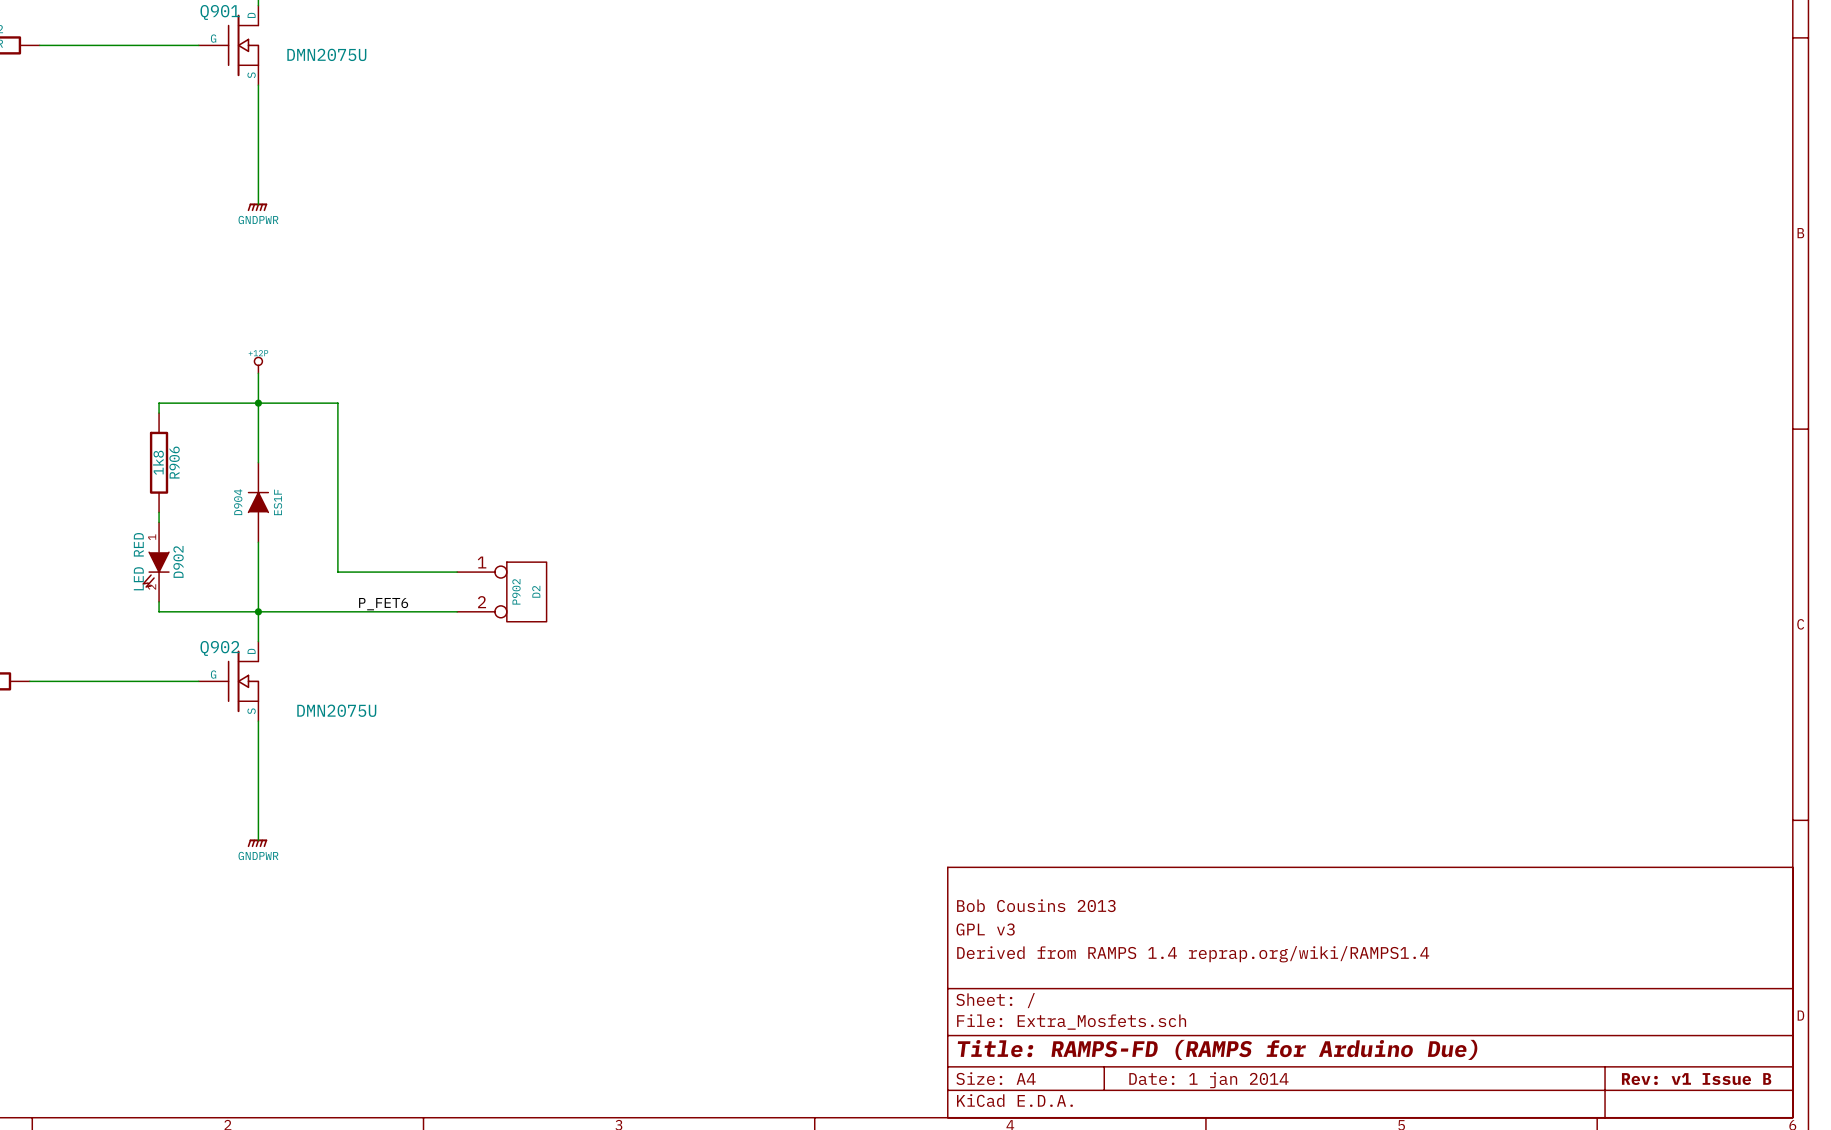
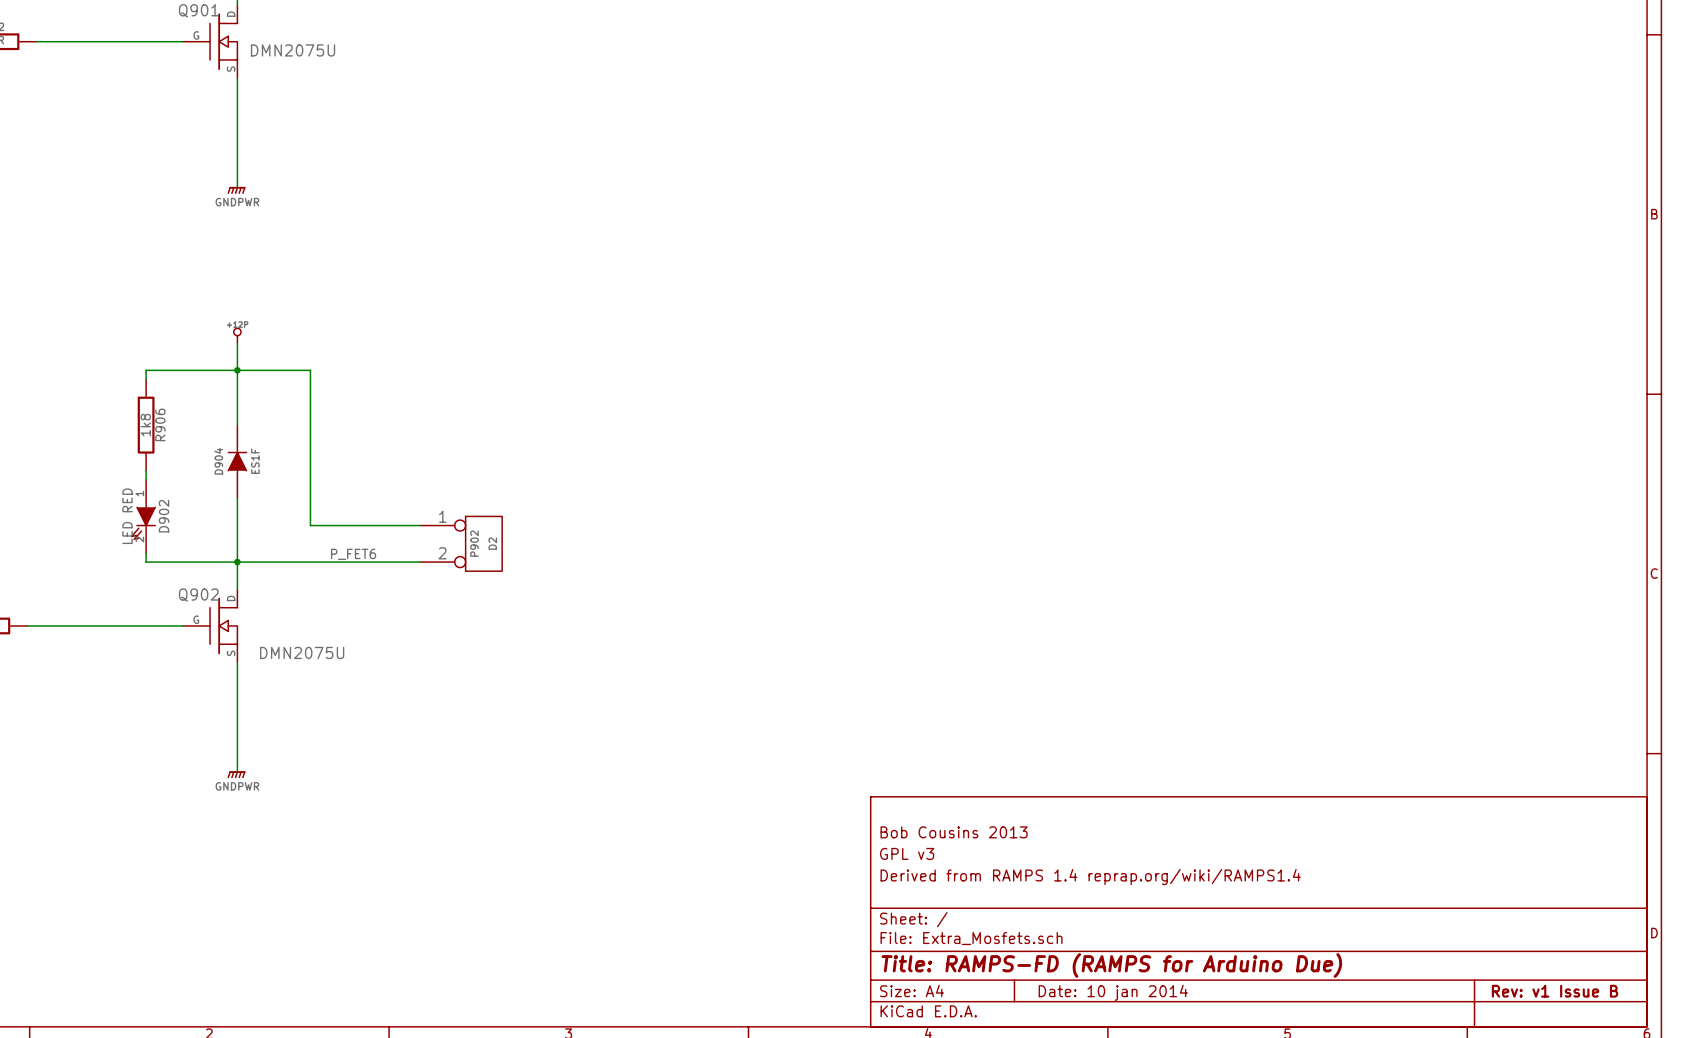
title block: Date: 1 jan 2014 (1208, 1080) -> Date: 10 jan 2014 (1113, 992)

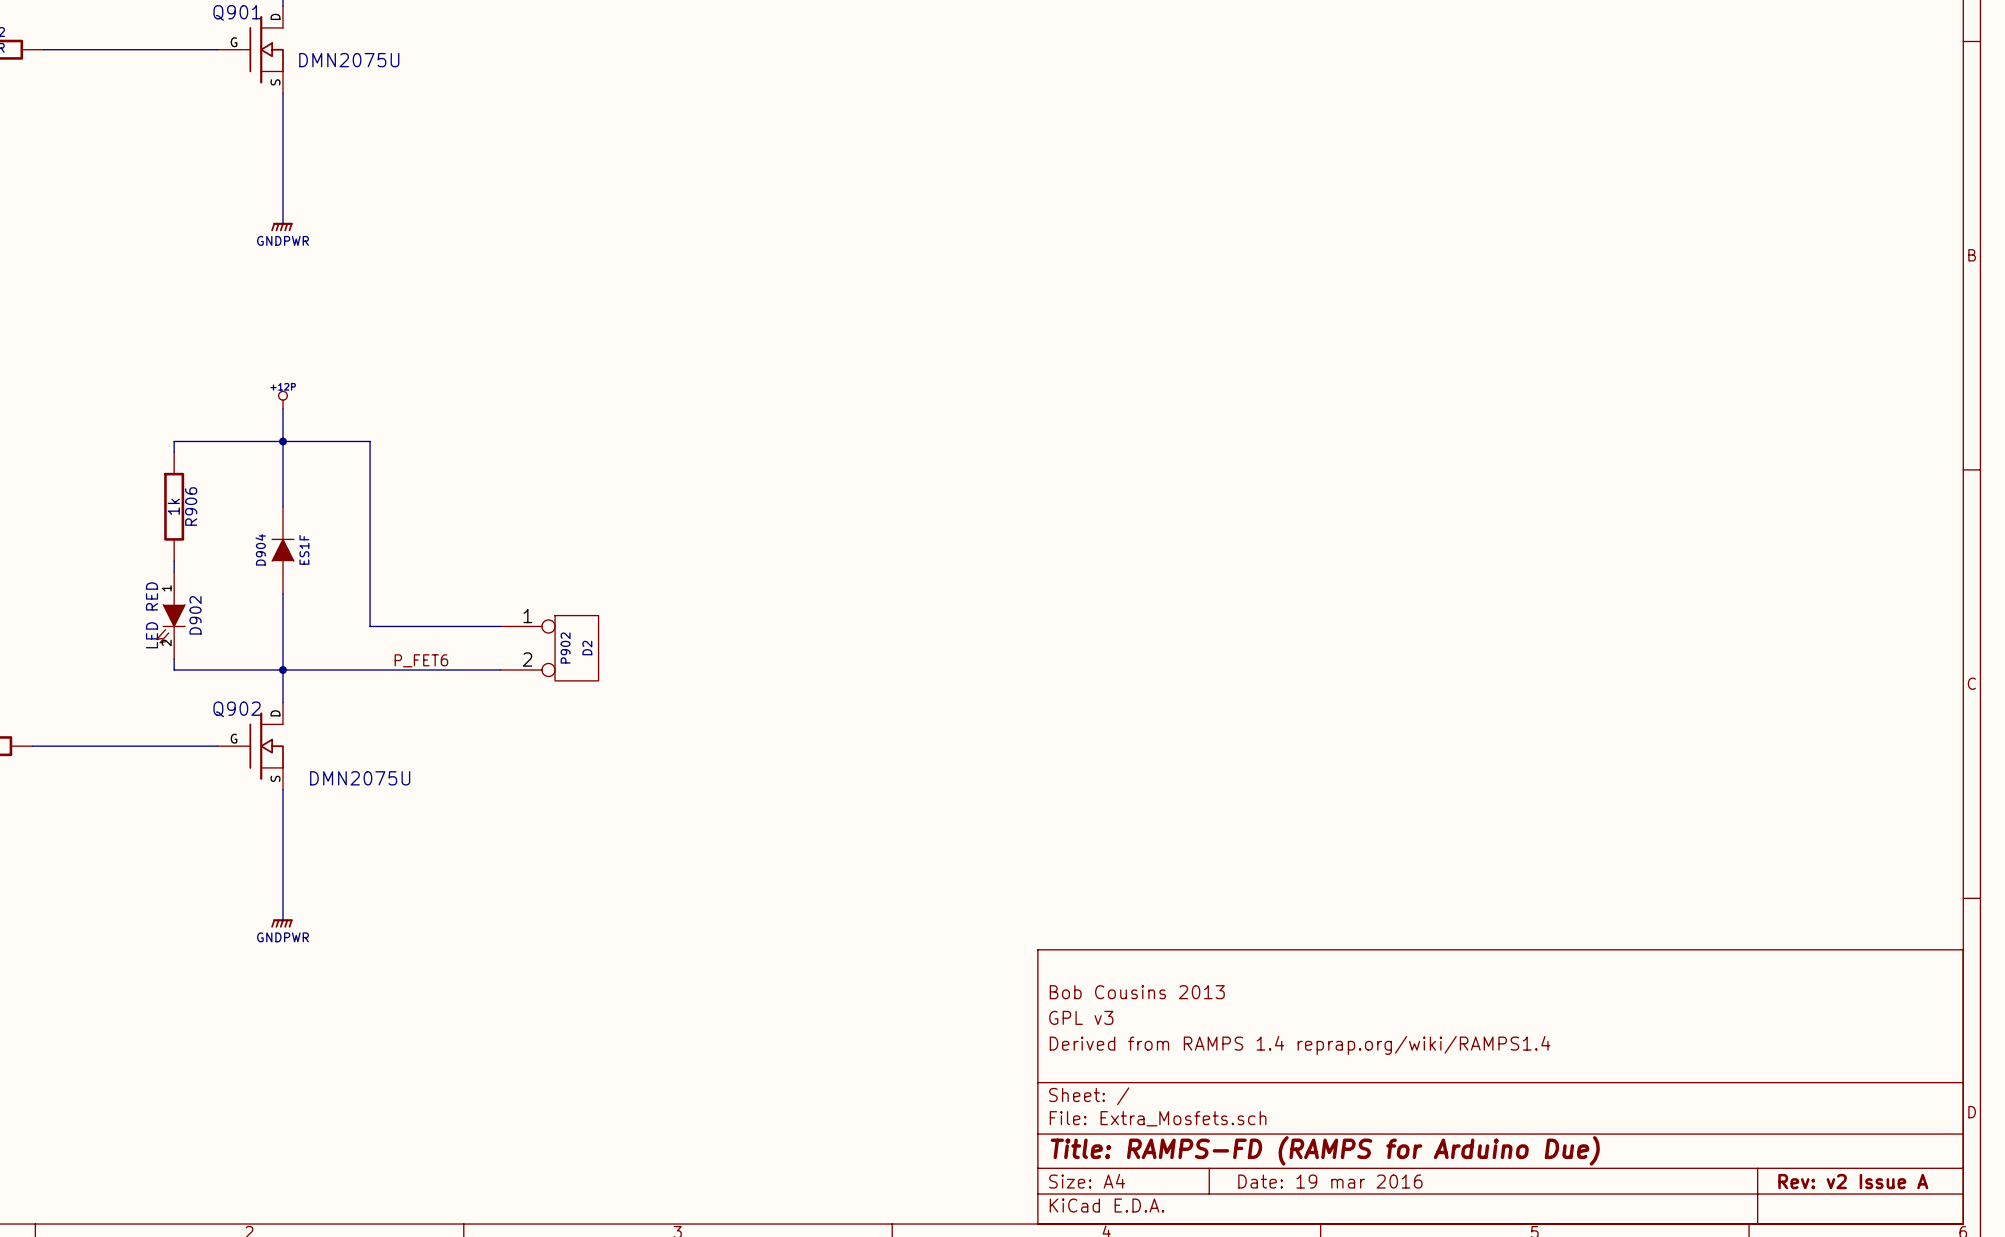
R906 value: 1k8 (145, 425) -> 1k (173, 506)
title block: Rev: v1 Issue B (1555, 991) -> Rev: v2 Issue A (1853, 1181)
title block: Date: 10 jan 2014 (1113, 992) -> Date: 19 mar 2016 (1330, 1181)

